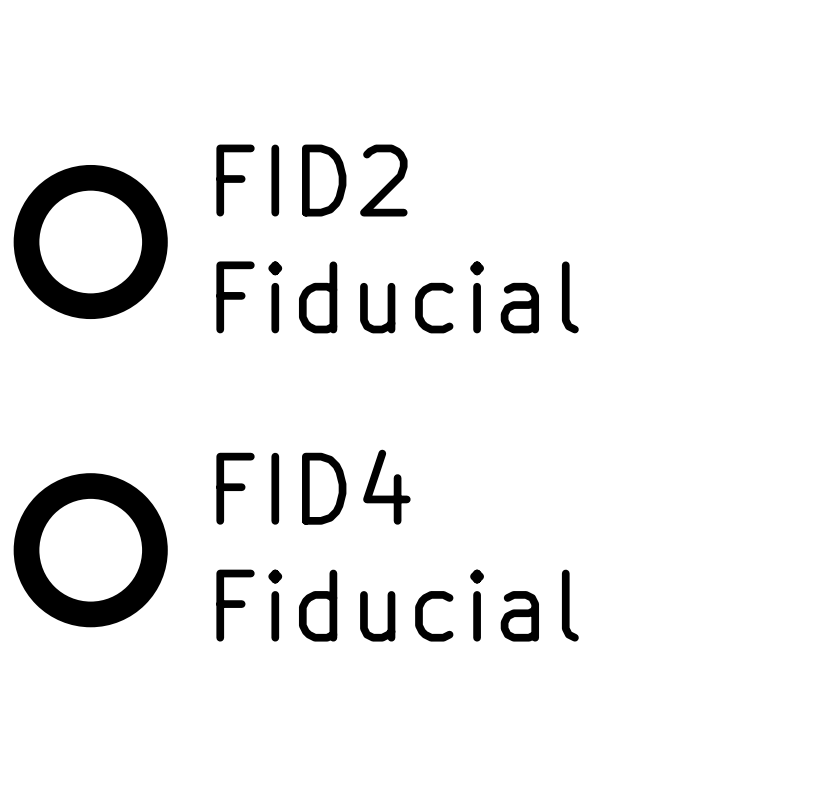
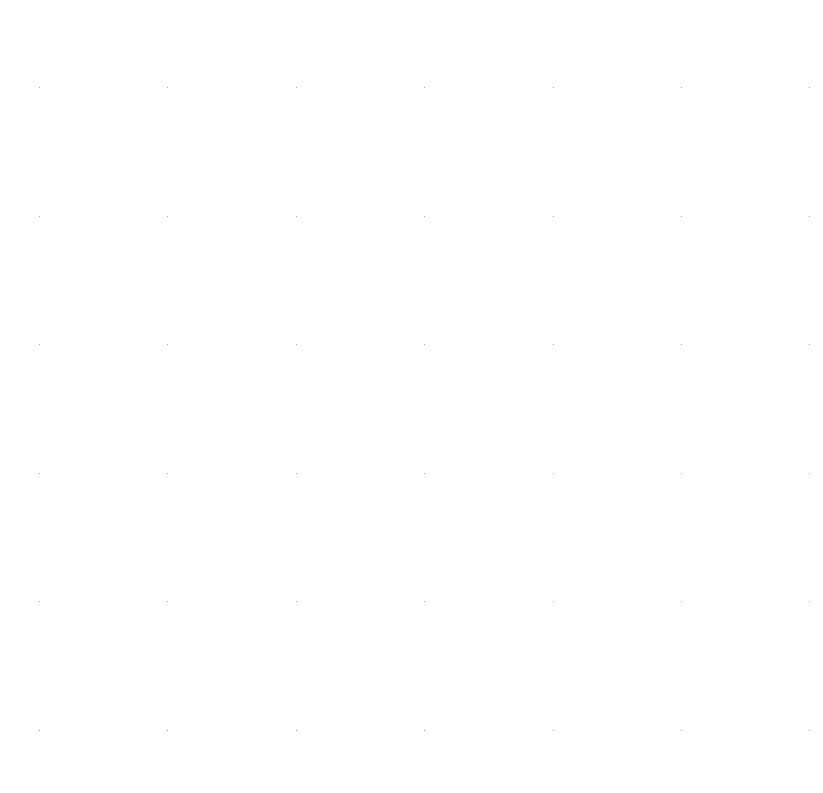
FID2: Fiducial (90, 242) -> none
FID4: Fiducial (90, 550) -> none

